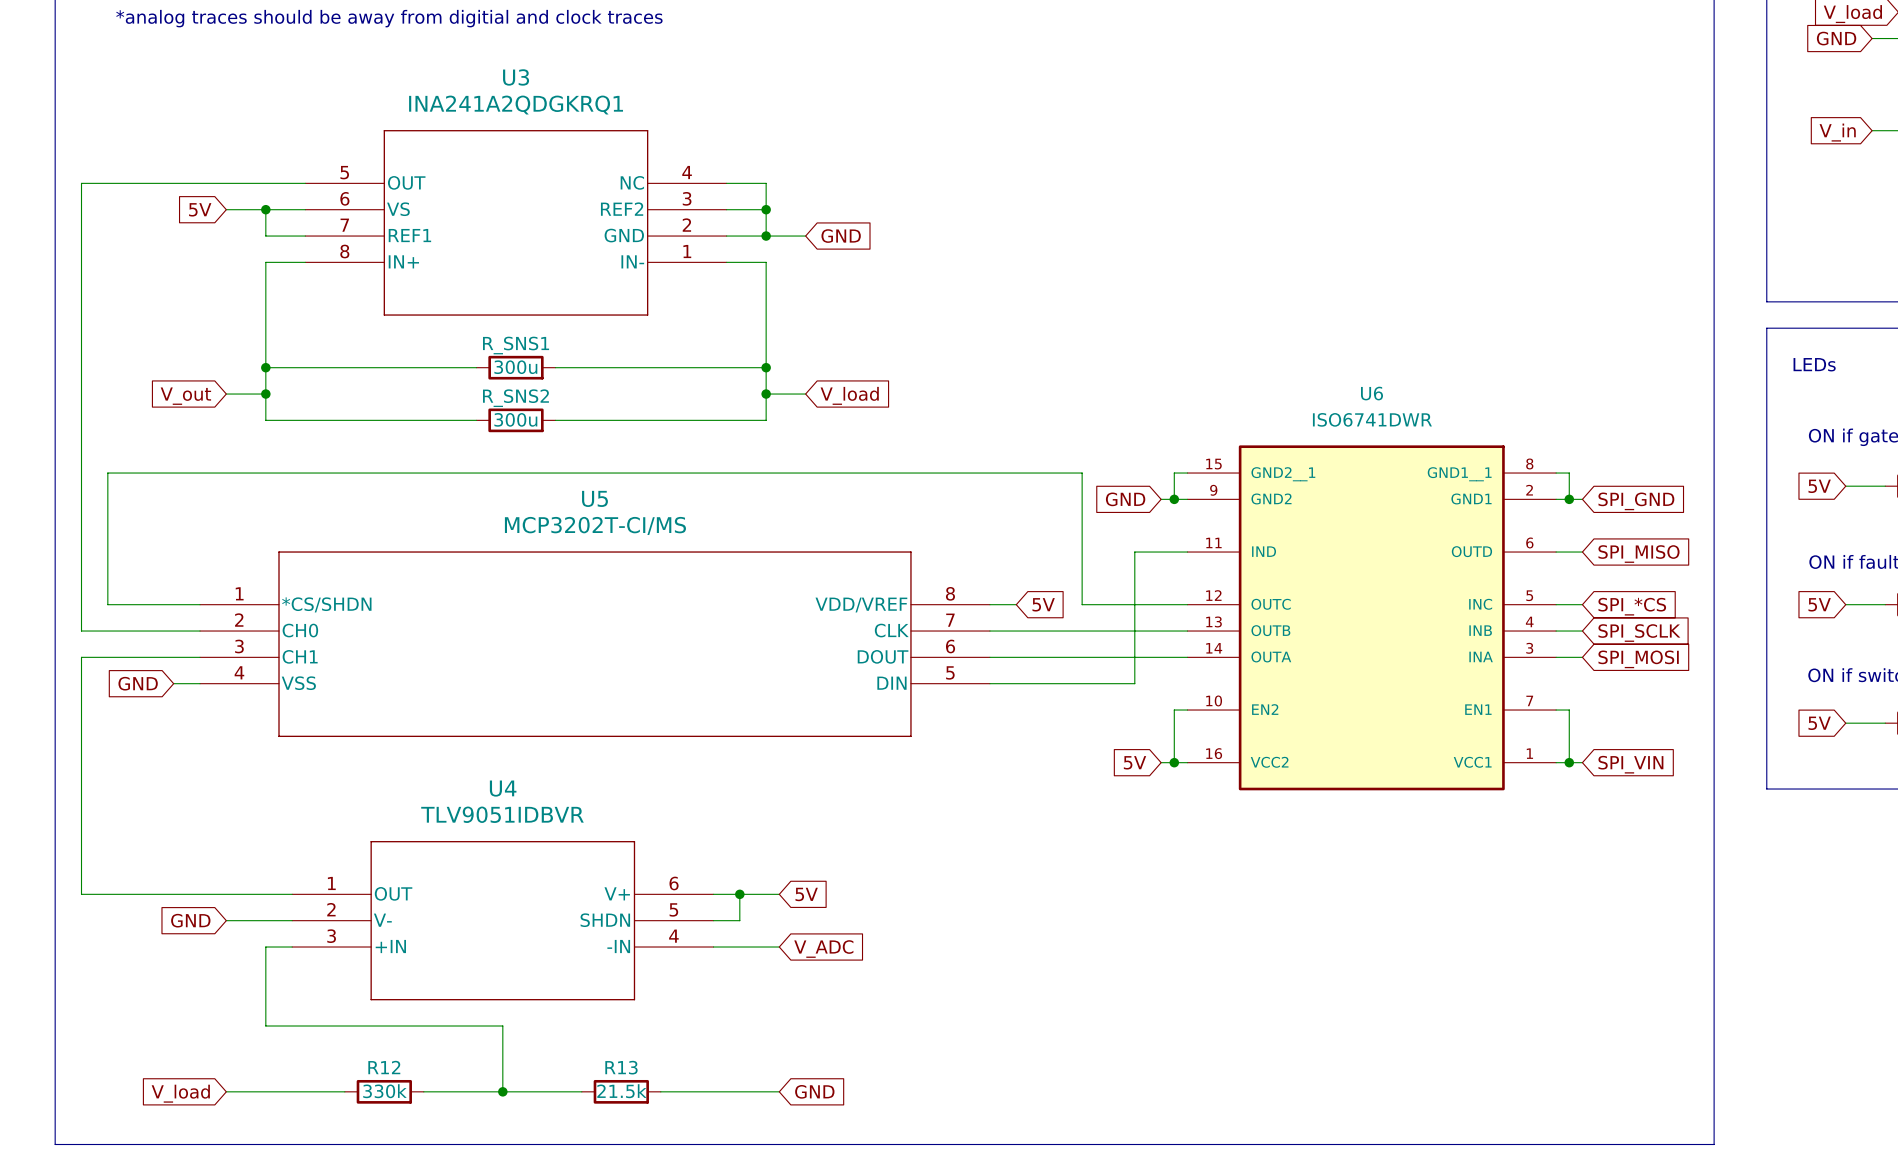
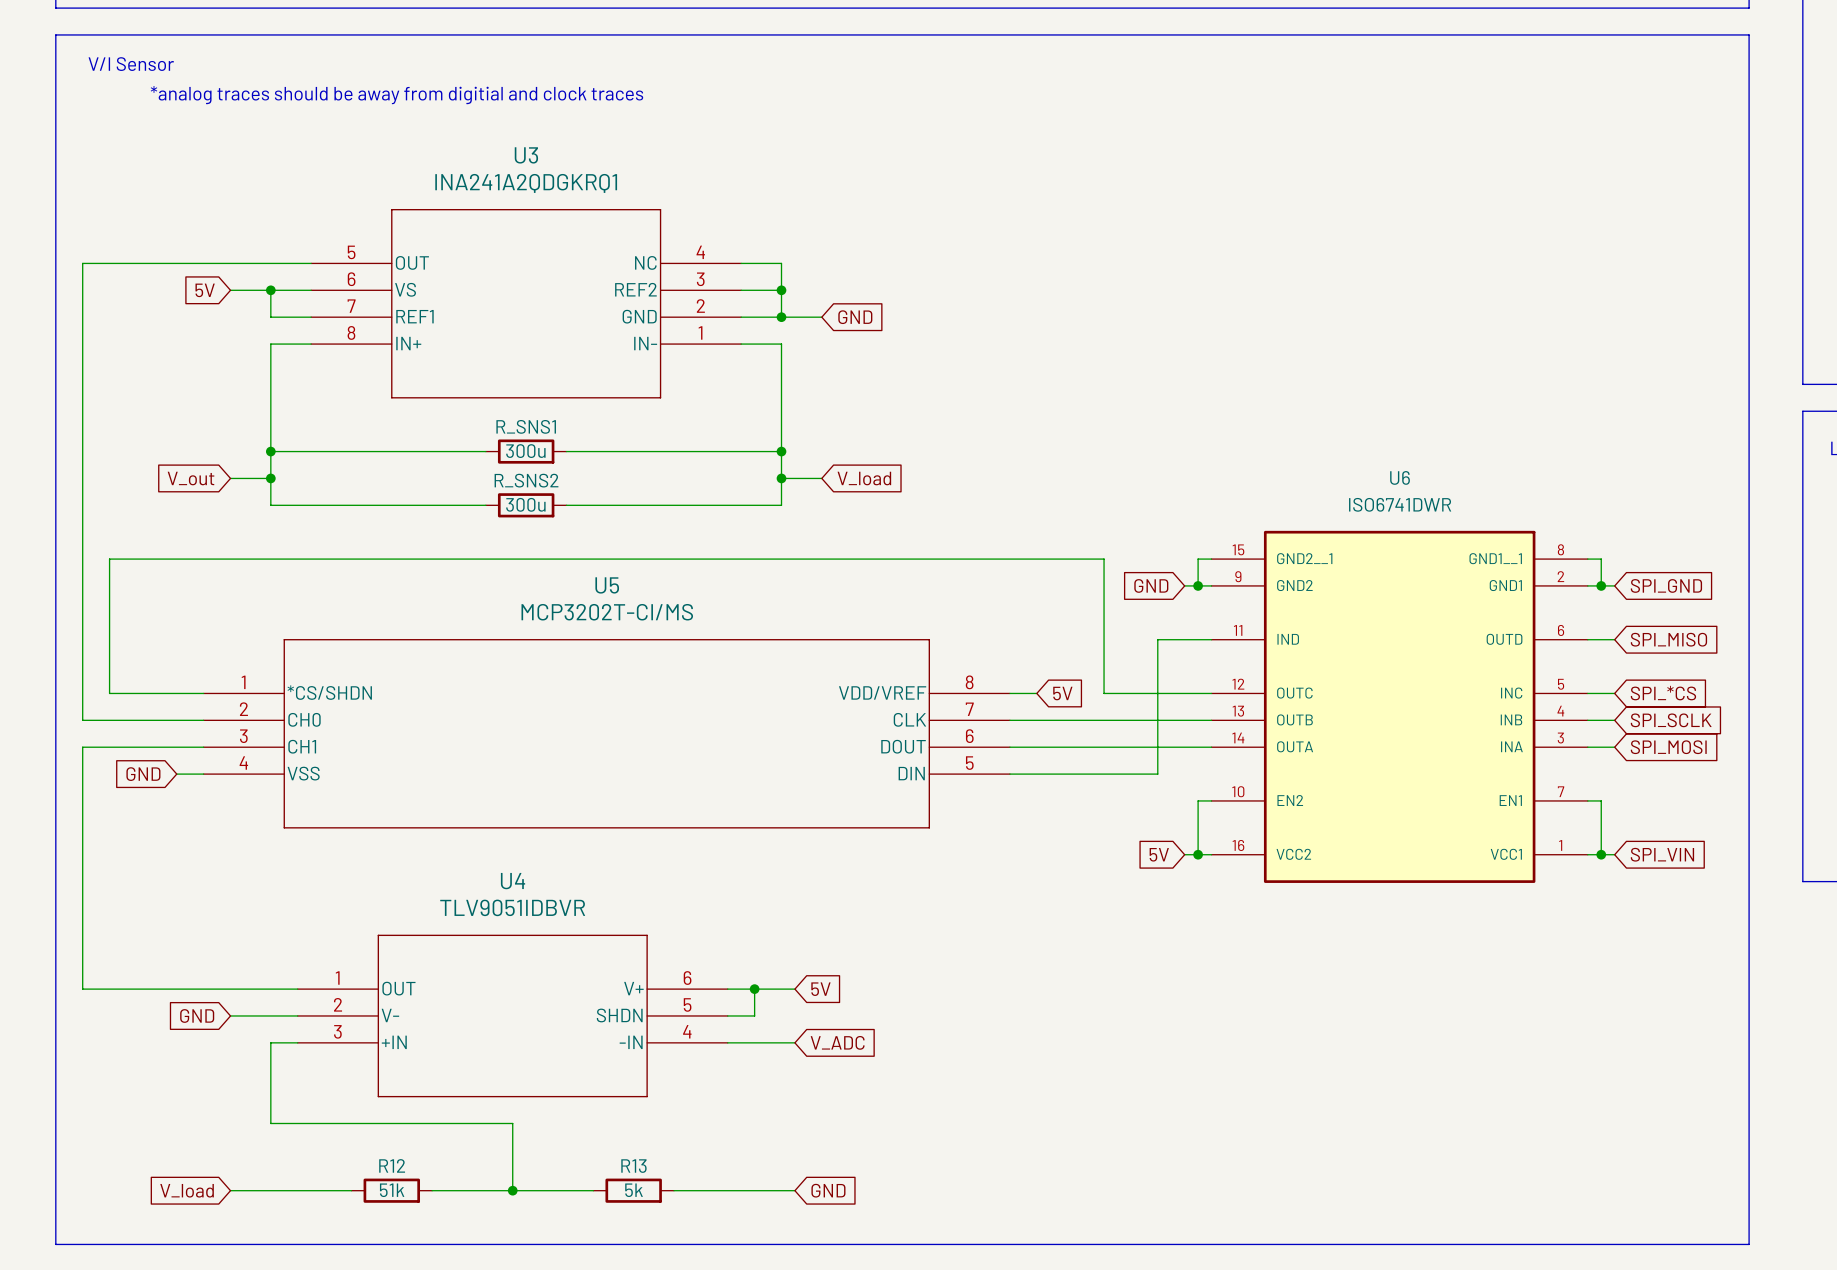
R12 value: 330k (384, 1091) -> 51k (392, 1190)
R13 value: 21.5k (621, 1091) -> 5k (634, 1190)

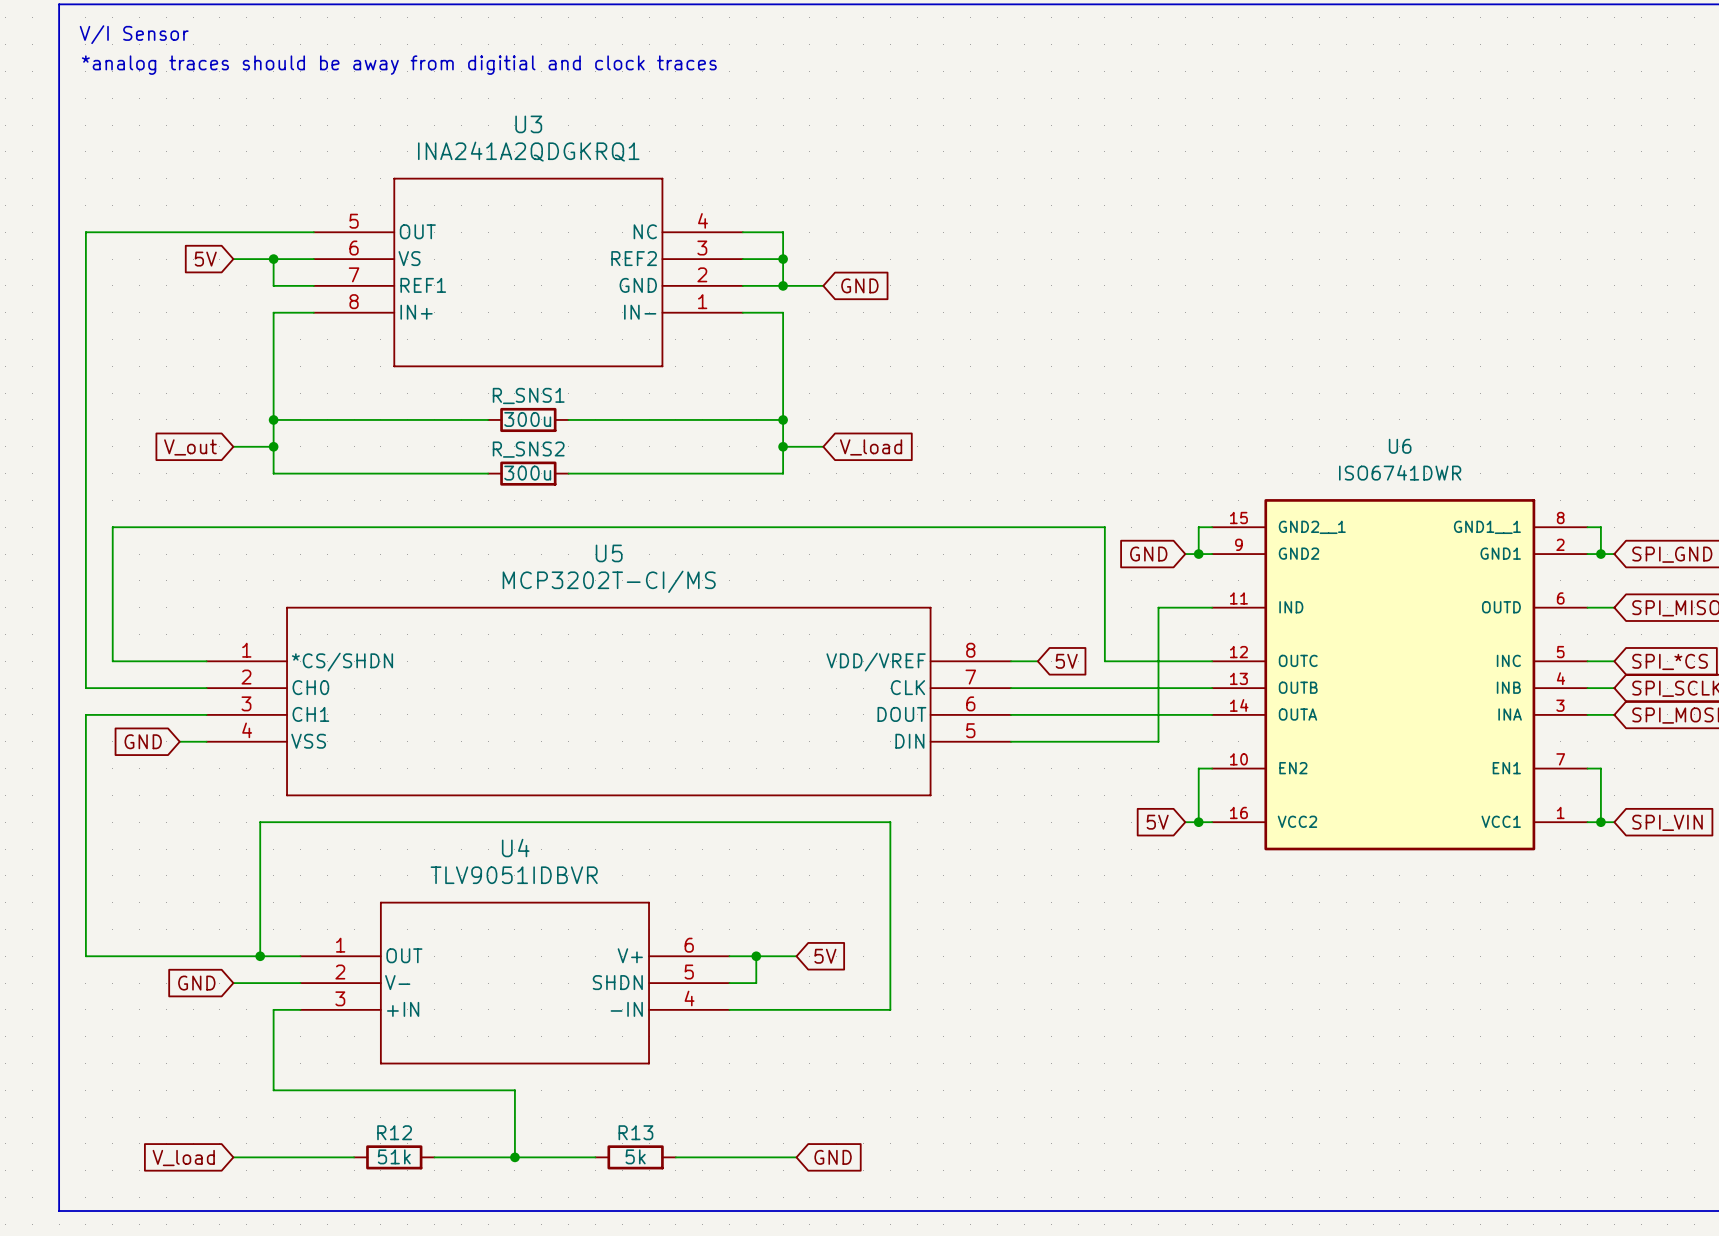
wire: none -> (260, 956) (260, 822) (890, 822) (890, 1009) (796, 1009)
junction: none -> (260, 956)
global label: V_ADC (837, 1042) -> none

